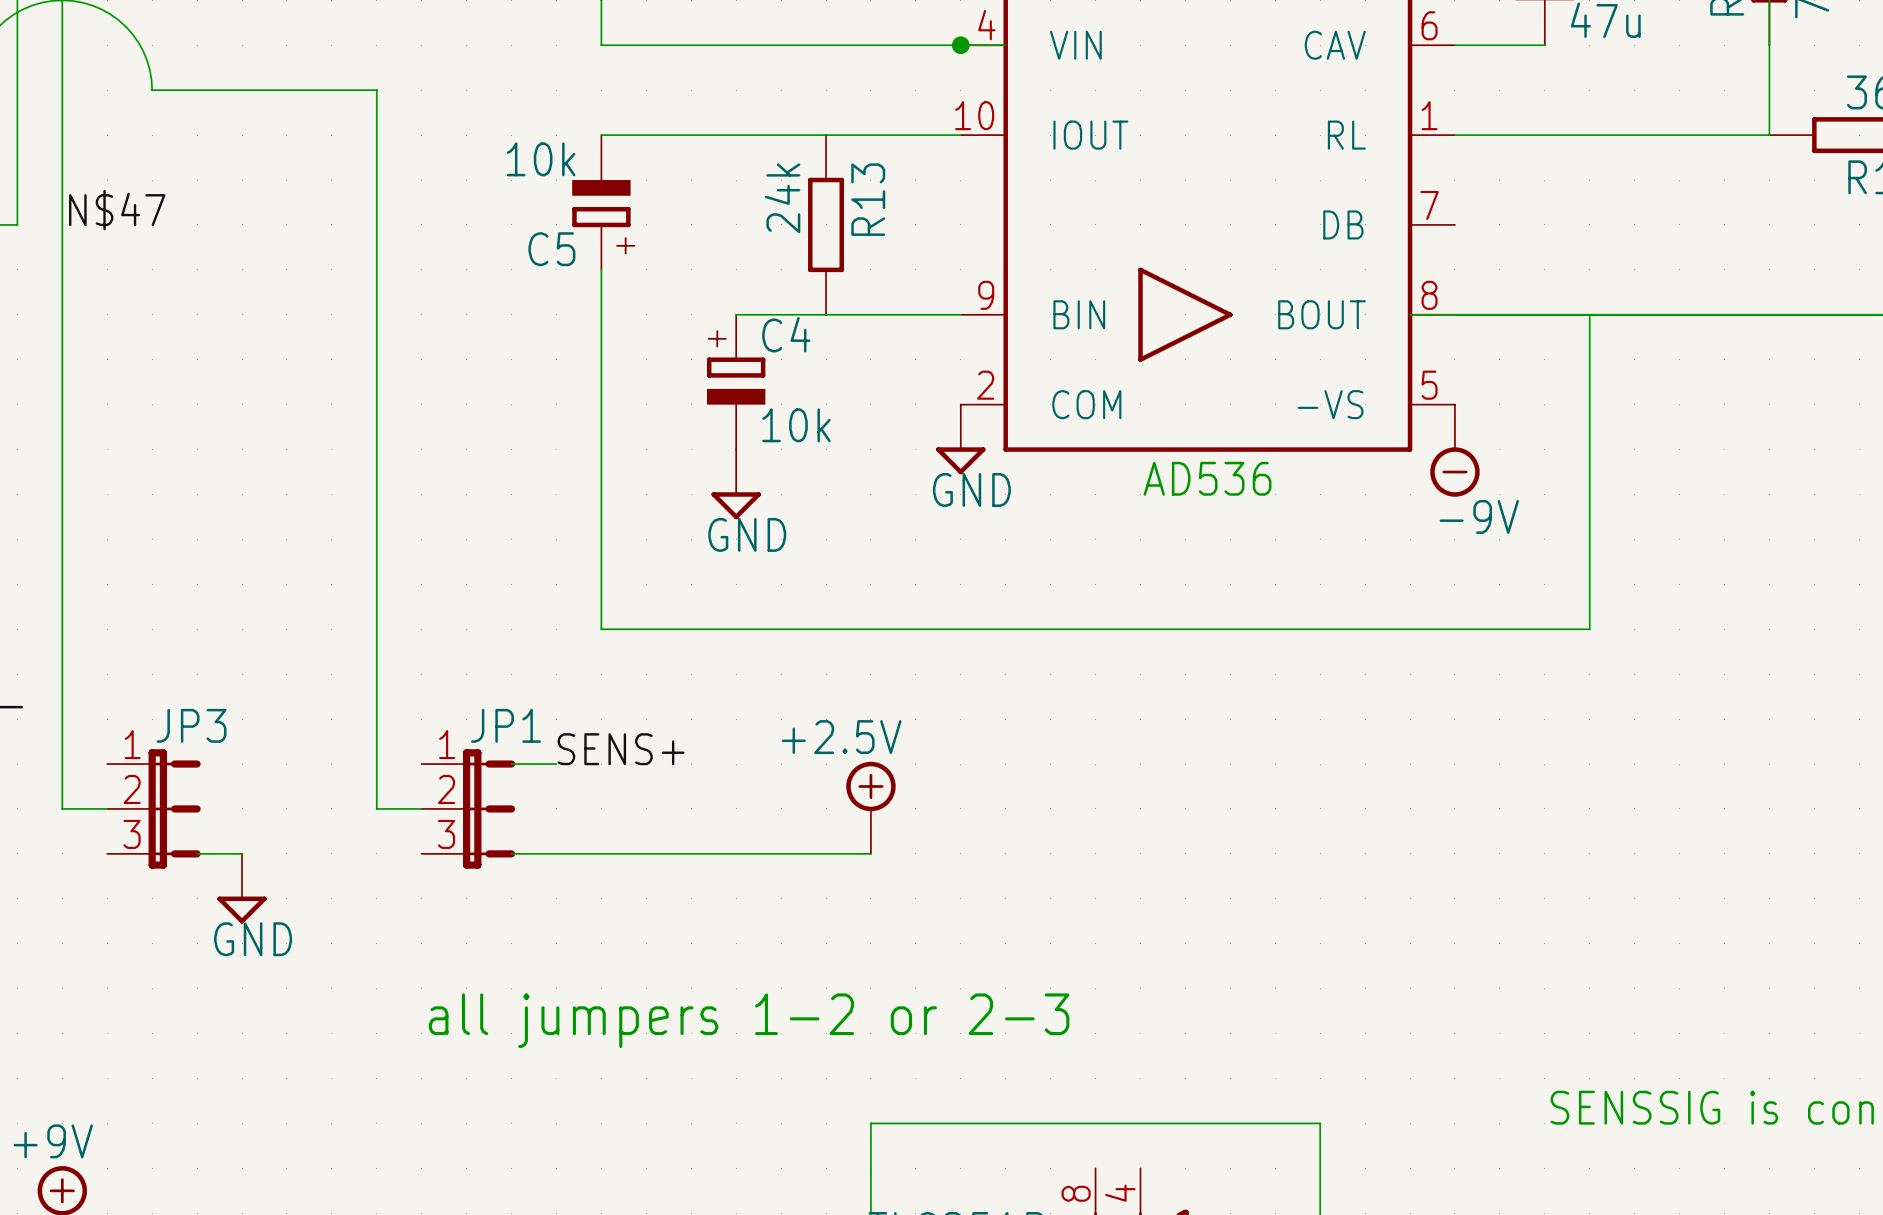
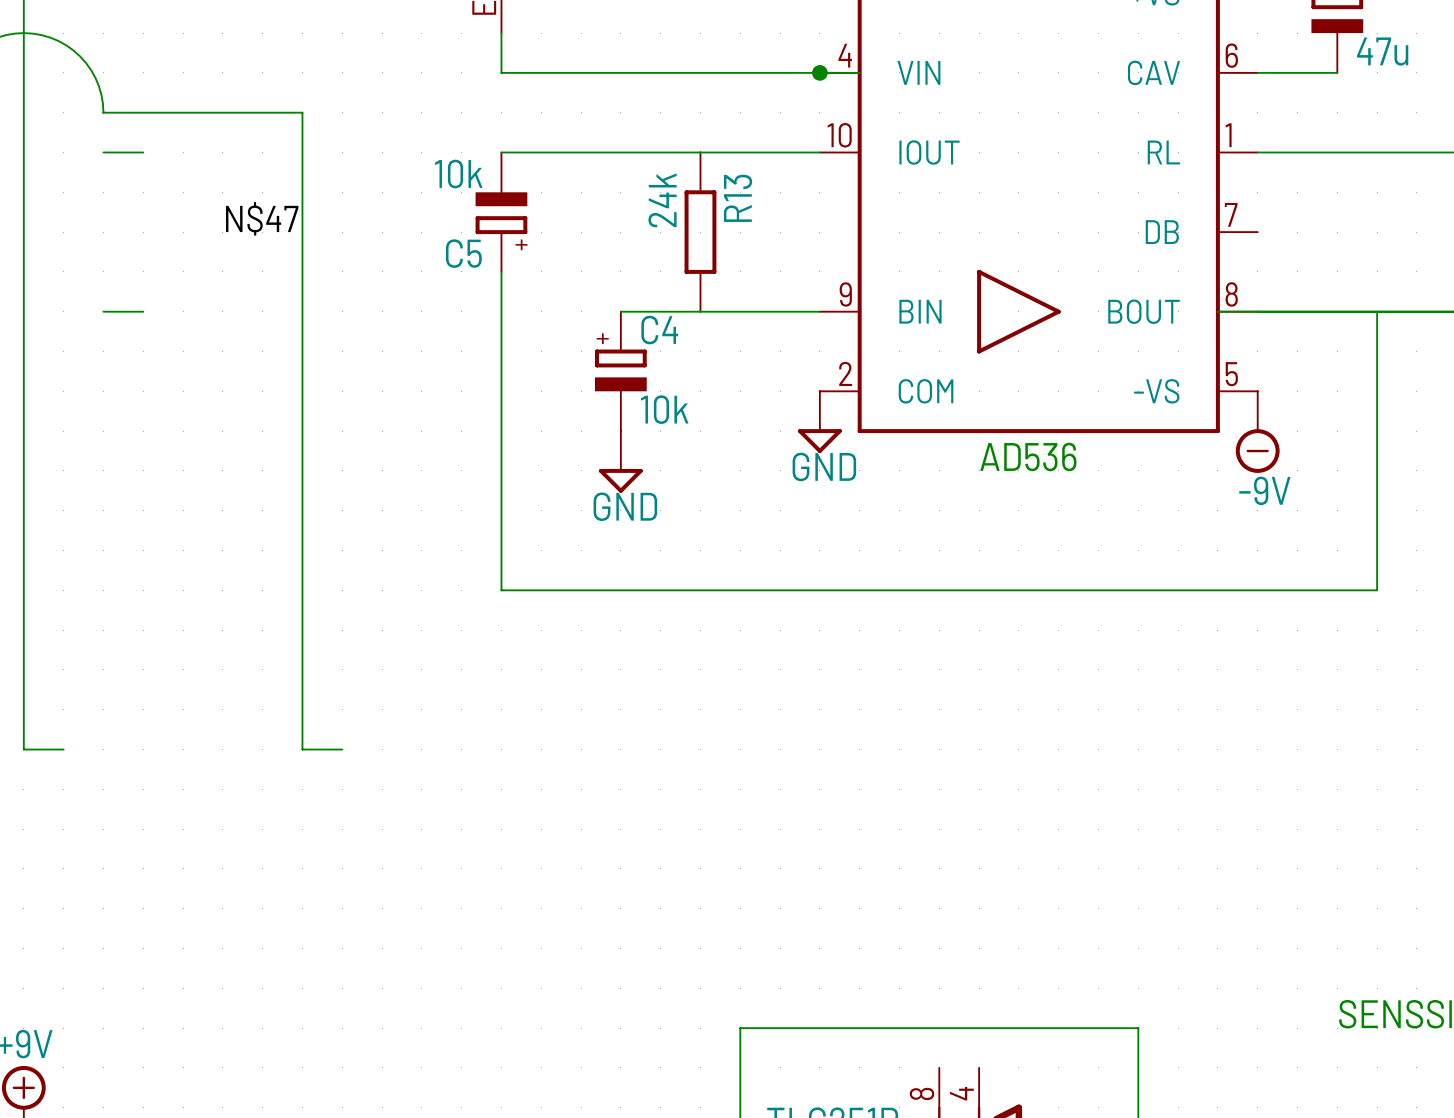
wire: none -> (103, 152) (143, 152)
label position: N$47 (117, 210) -> N$47 (262, 218)
wire: none -> (103, 311) (143, 311)
label: SENS+ (621, 749) -> none
wire: (511, 764) (556, 764) -> none
power symbol: +2.5V (870, 807) -> none
JP3: (153, 808) -> none
JP1: (468, 808) -> none
wire: (197, 853) (242, 853) -> none
wire: (511, 853) (870, 853) -> none
power symbol: GND (242, 888) -> none
text: all jumpers 1-2 or 2-3 (749, 1020) -> none

